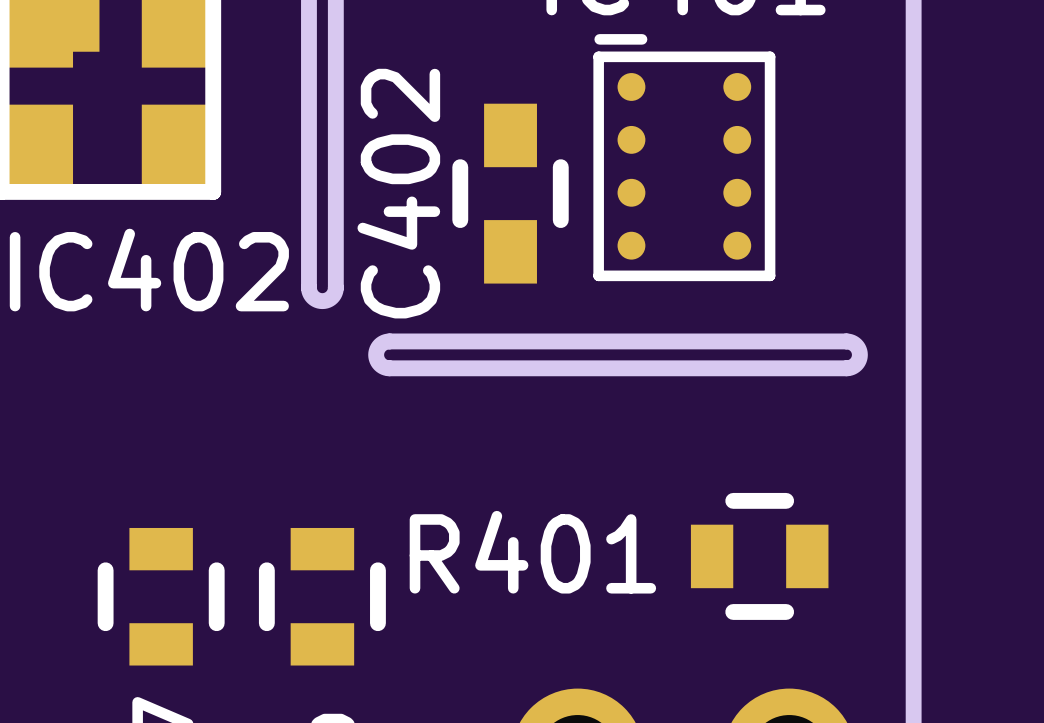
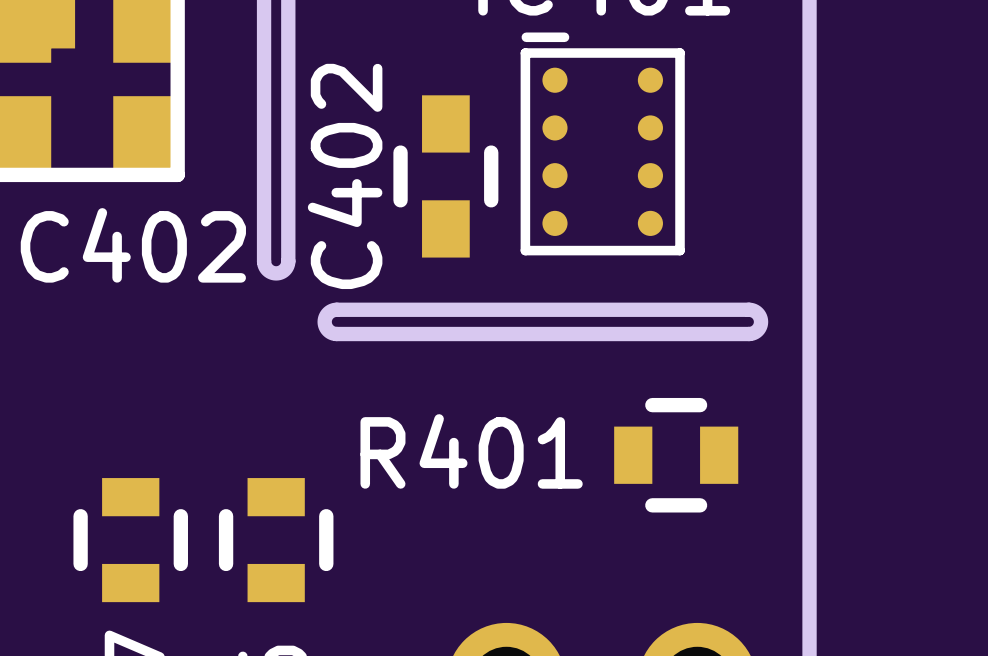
R401 position: (759, 556) -> (676, 455)

